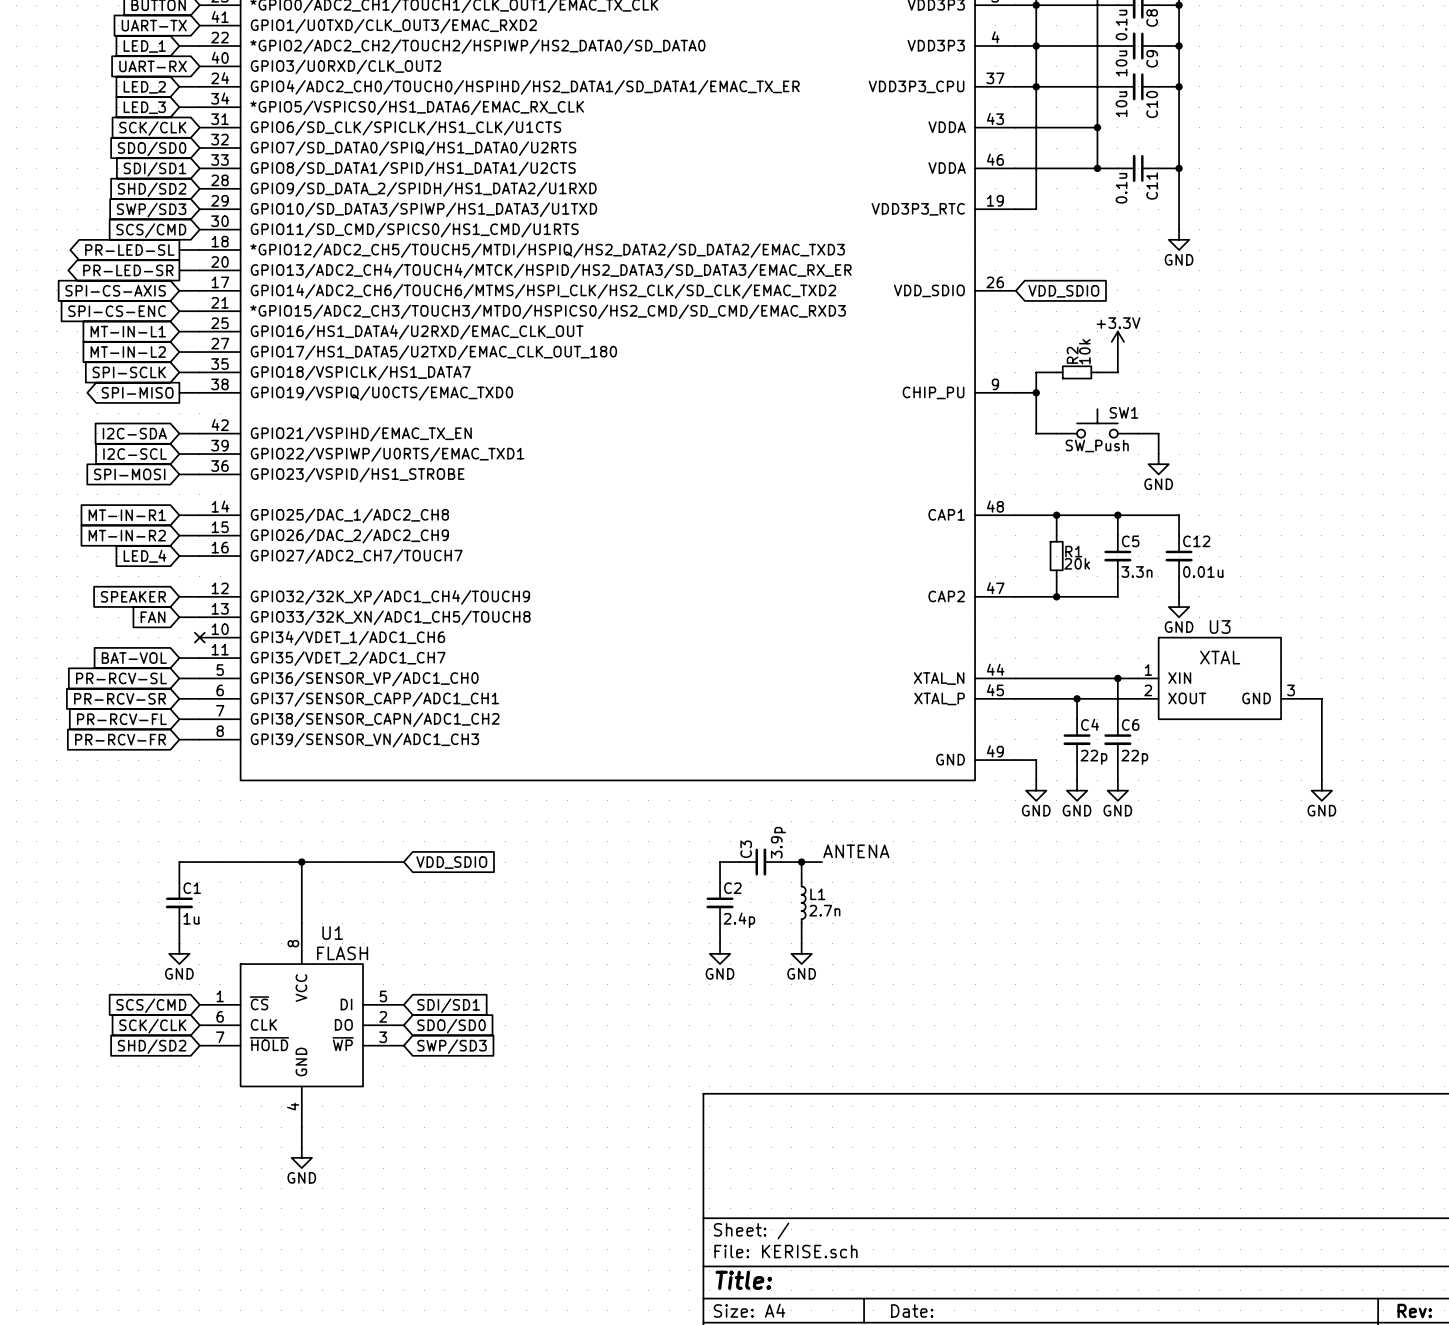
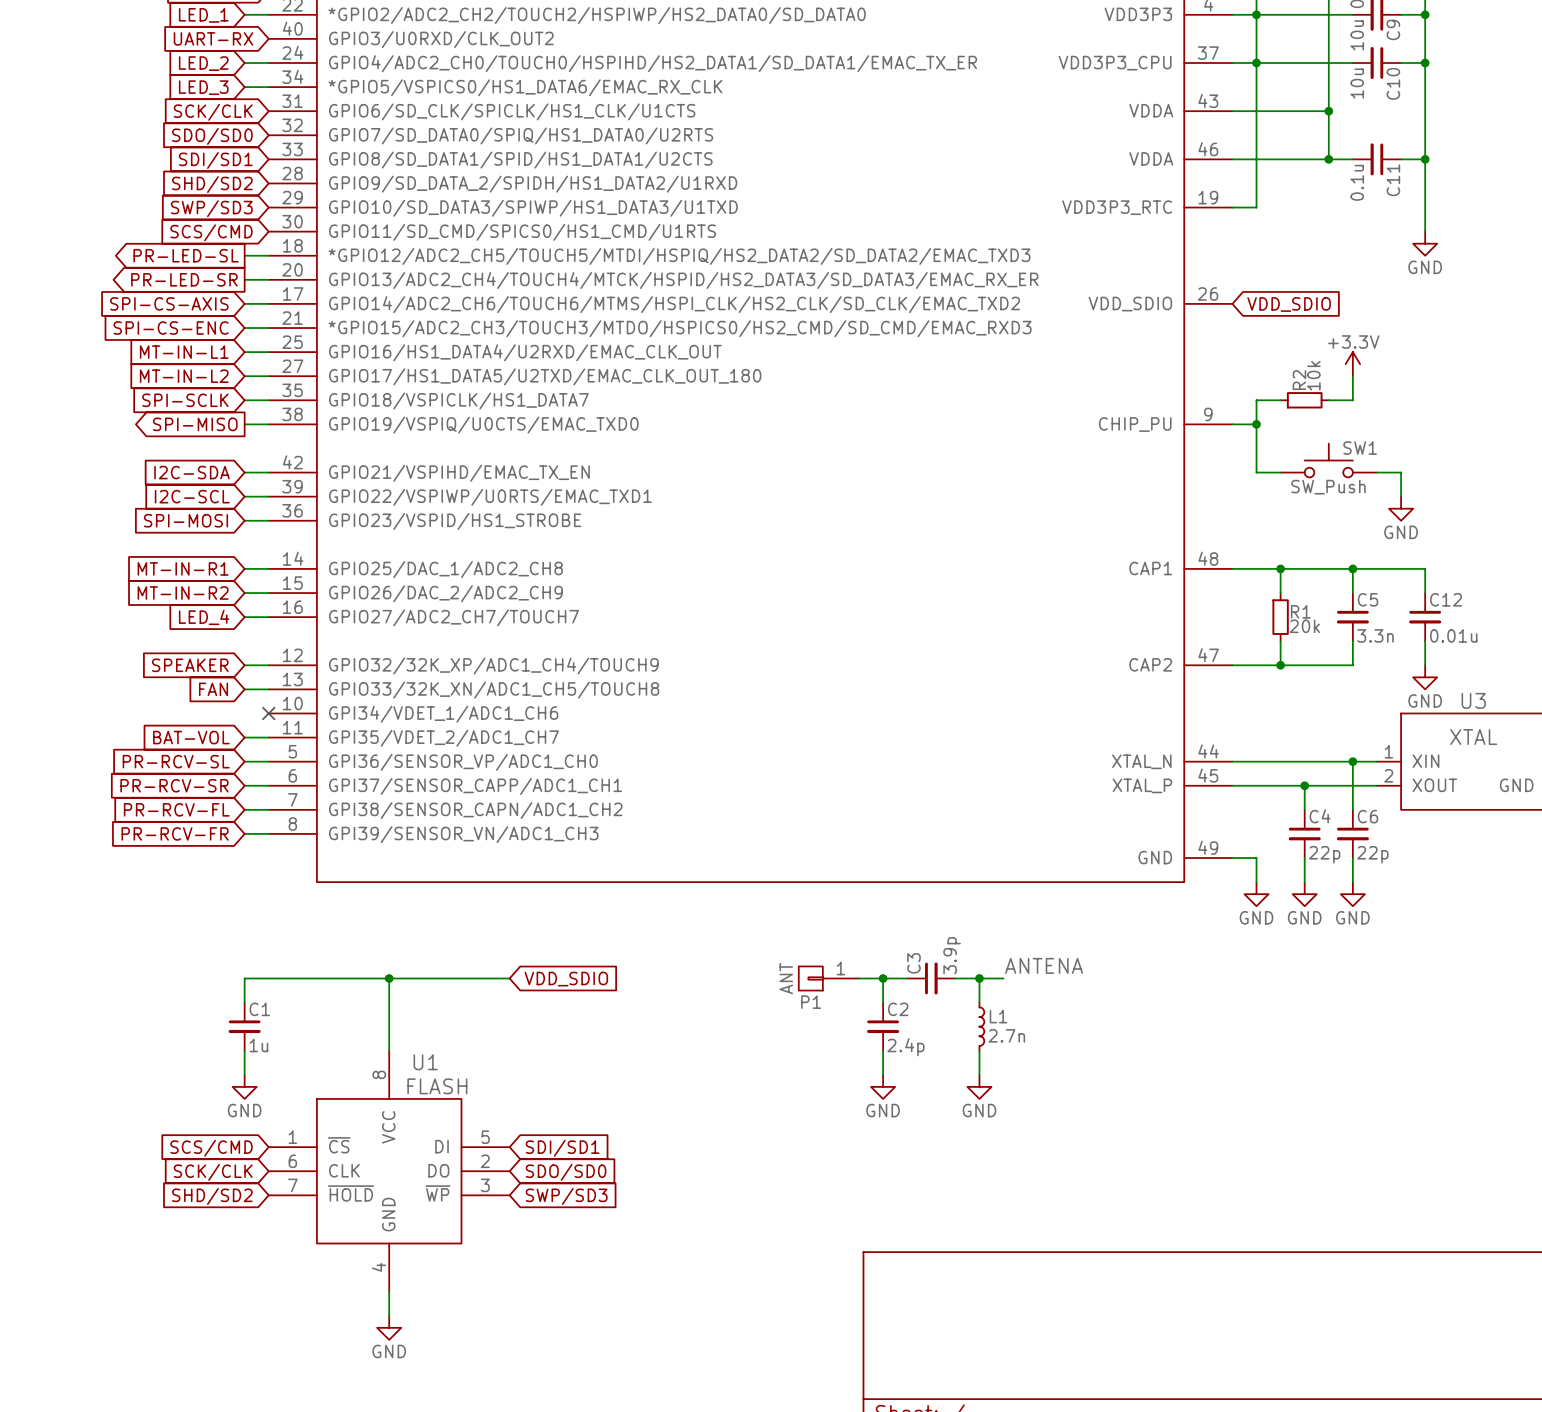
P1: none -> ANT (828, 978)
wire: none -> (858, 978) (883, 978)
junction: none -> (883, 978)

